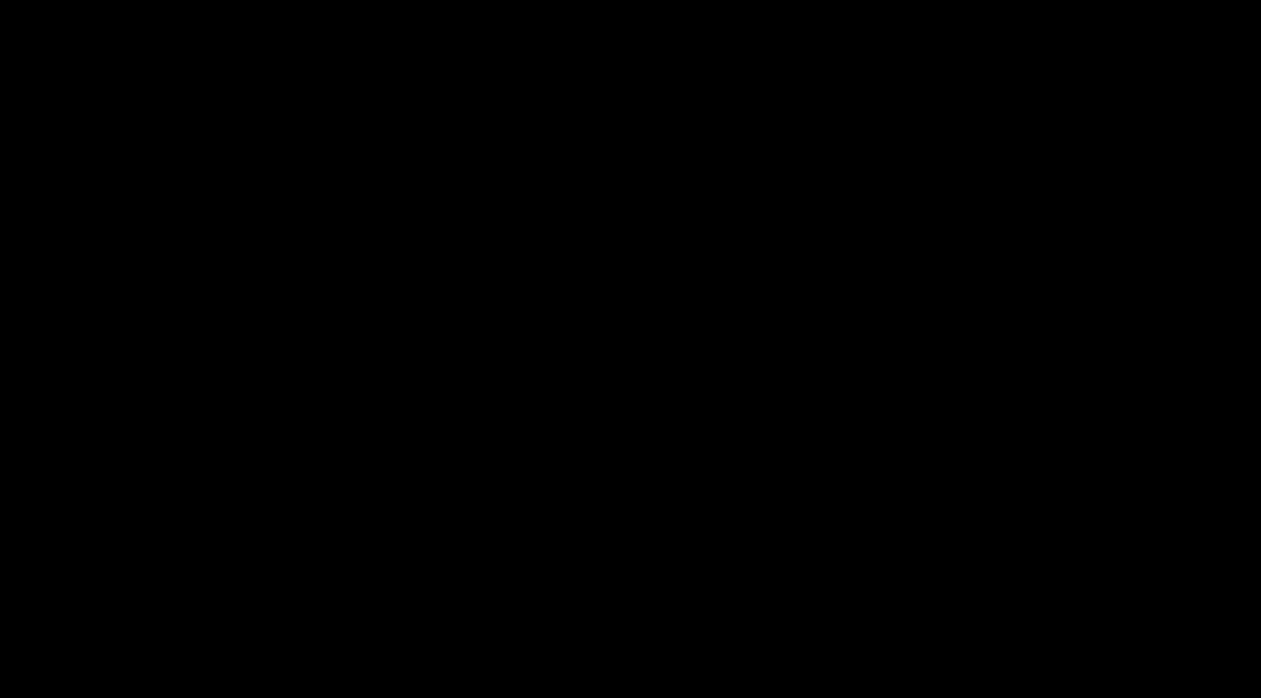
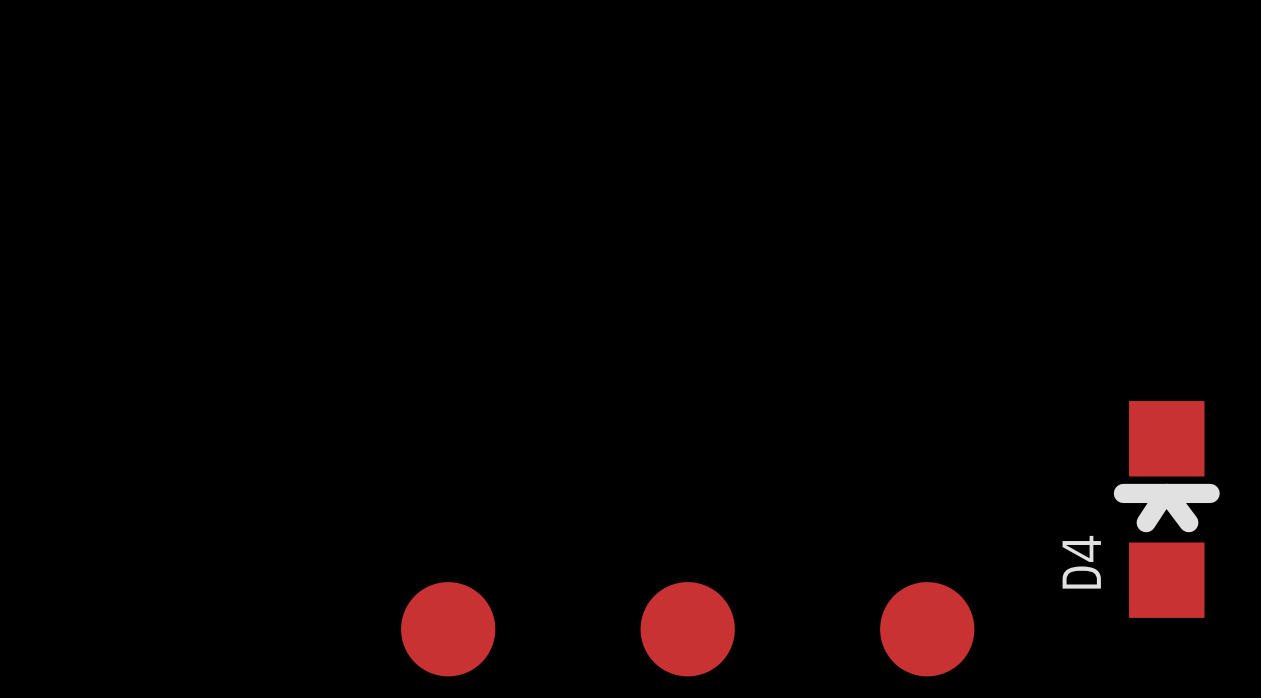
D4: none -> (1166, 509)
part: none -> (448, 629)
part: none -> (687, 629)
part: none -> (927, 629)

